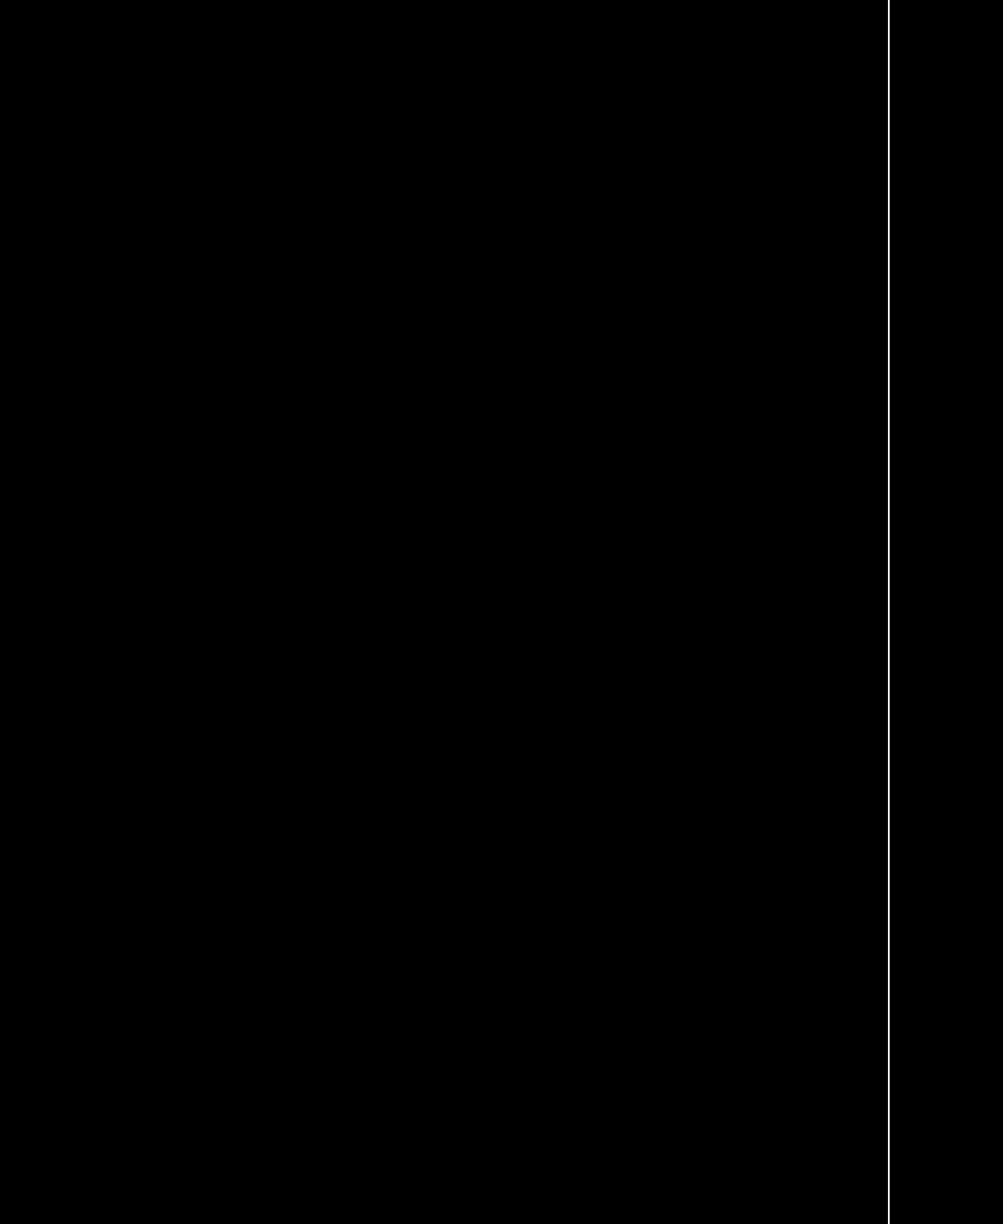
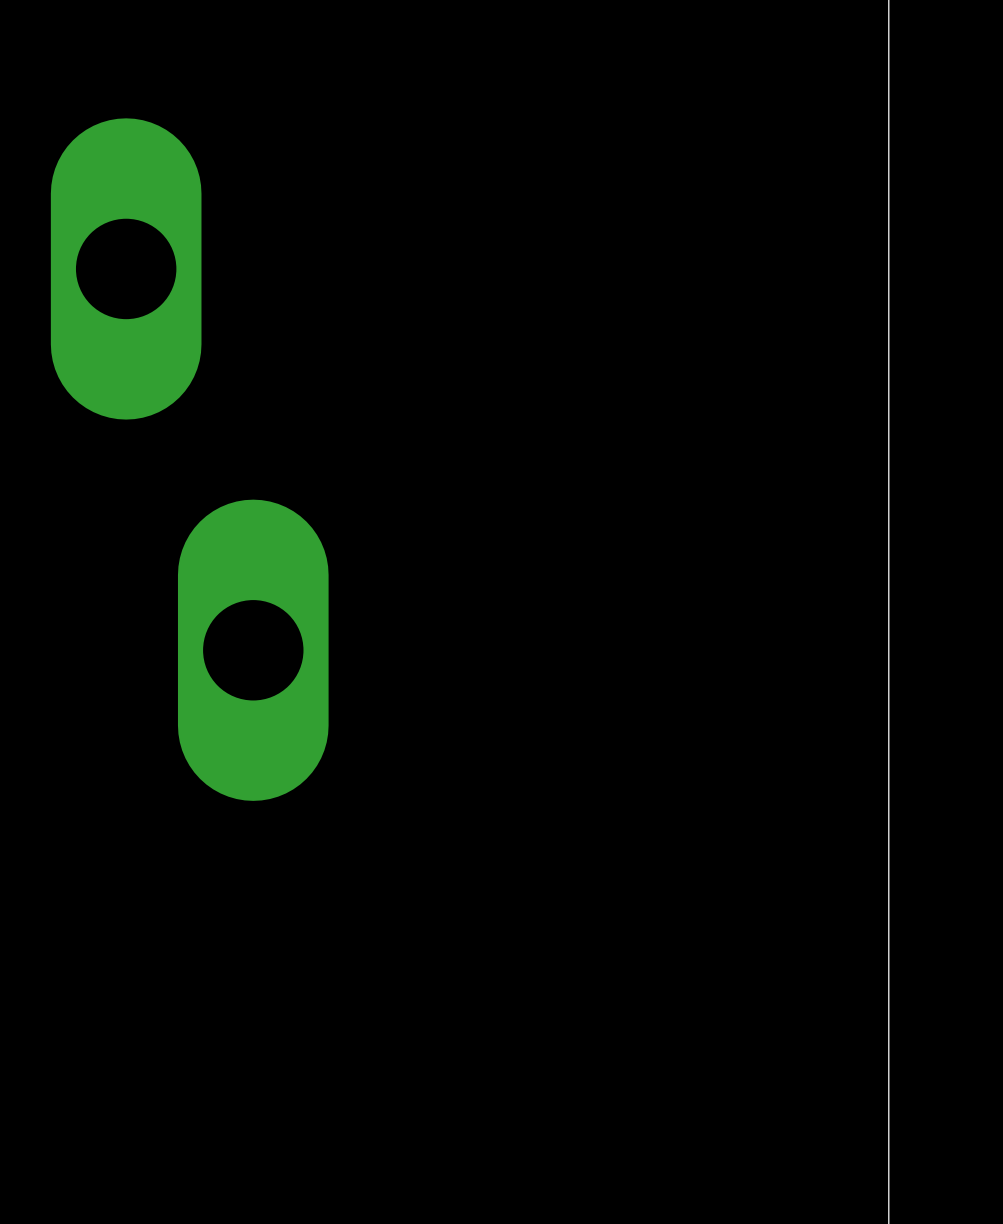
part: none -> (126, 268)
part: none -> (253, 650)

